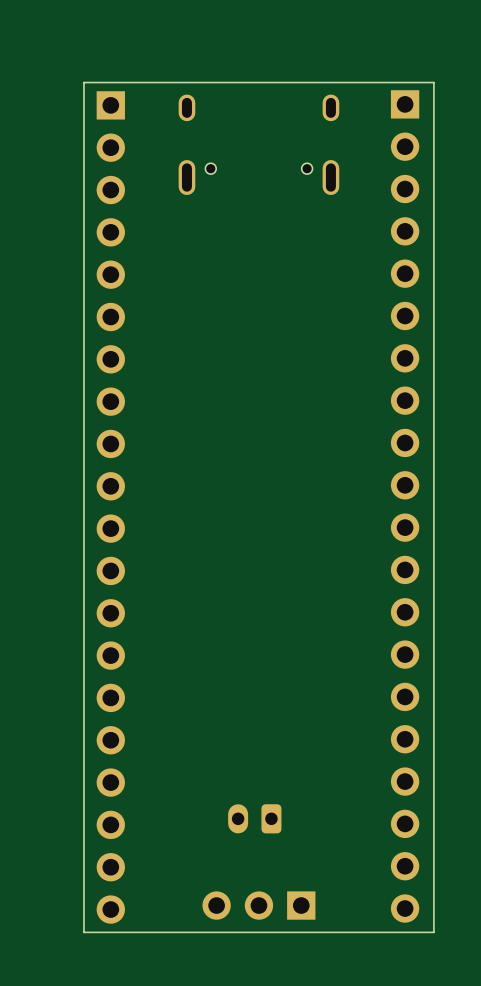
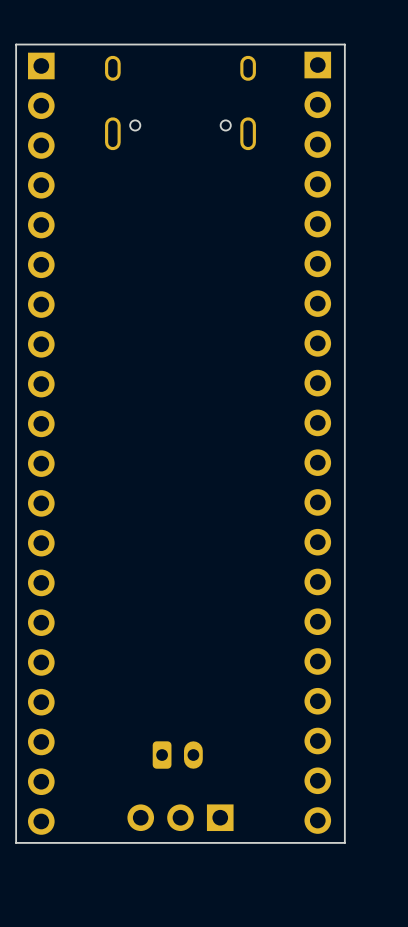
part rotation: 0° (254, 818) -> 180° (177, 755)

